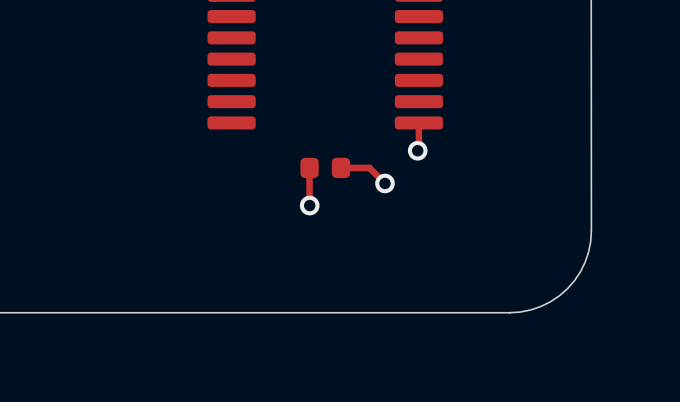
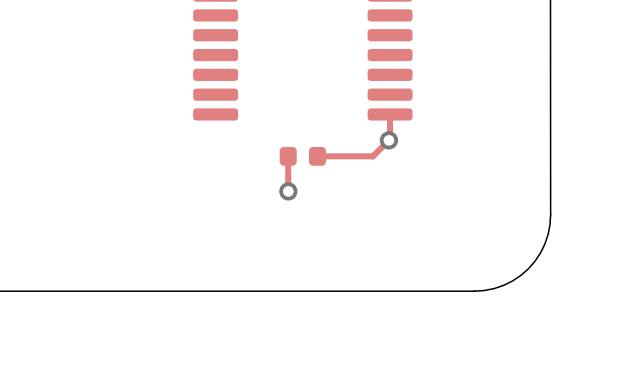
top track: (369, 167) (384, 183) -> (343, 156) (372, 156) (388, 140)
via: (384, 183) -> none

